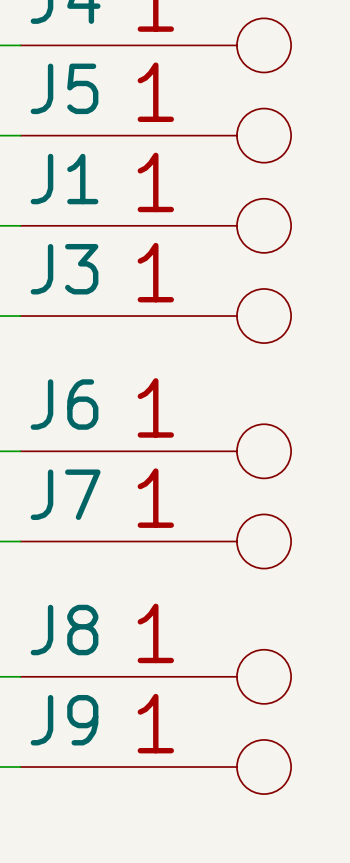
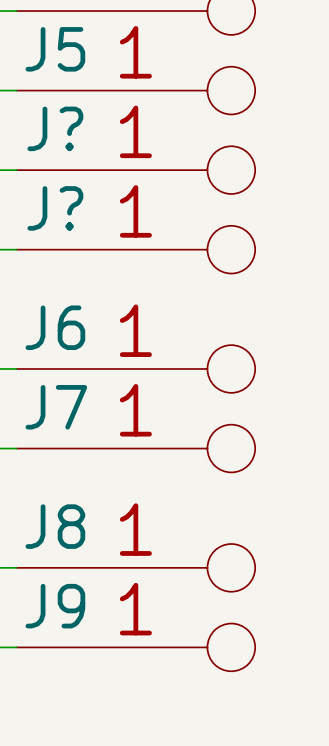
J1 name: J1 (64, 179) -> J? (55, 128)
J3 name: J3 (64, 269) -> J? (55, 208)

